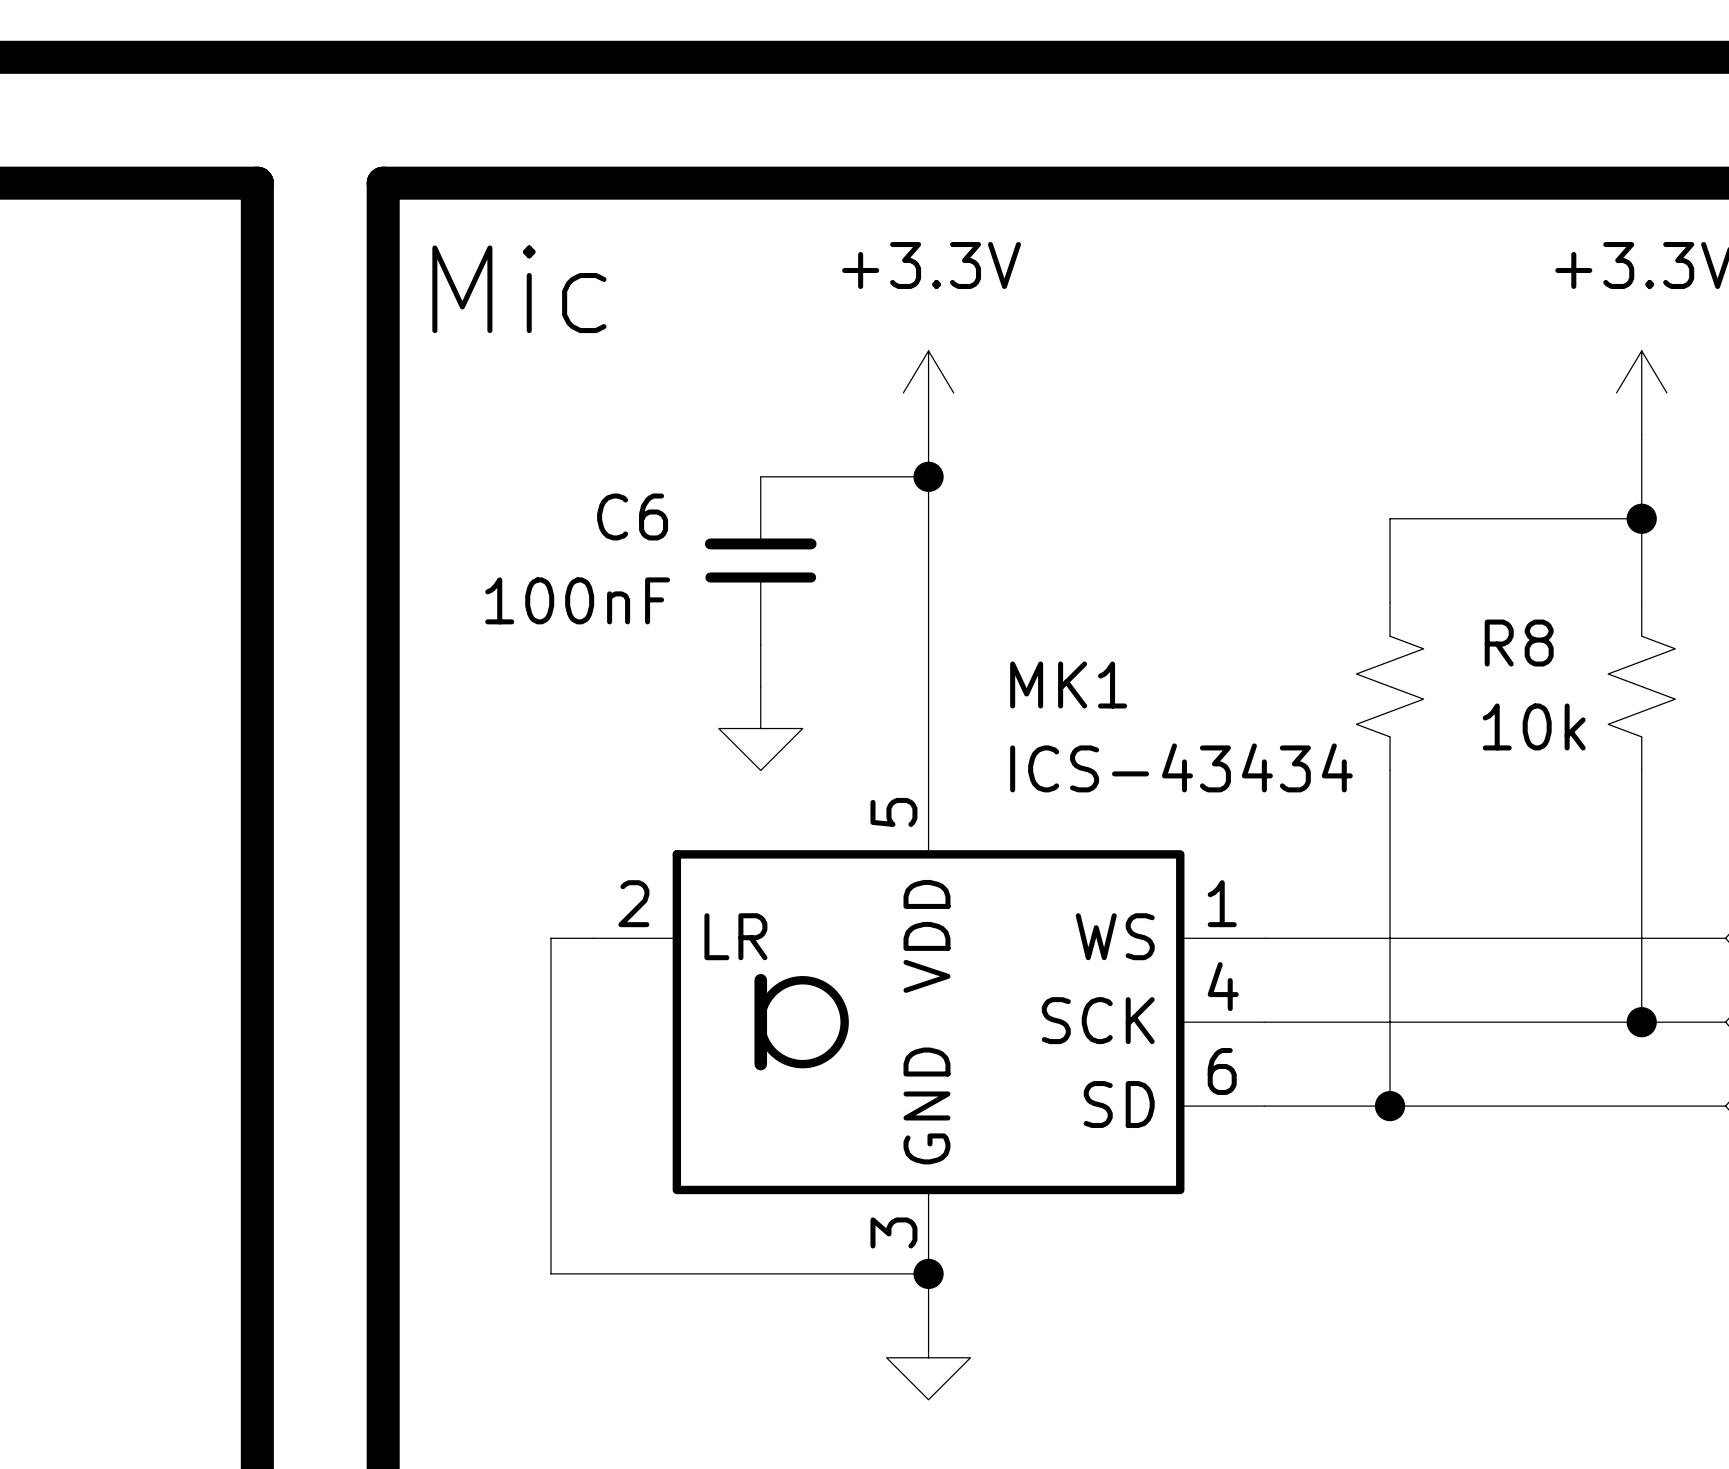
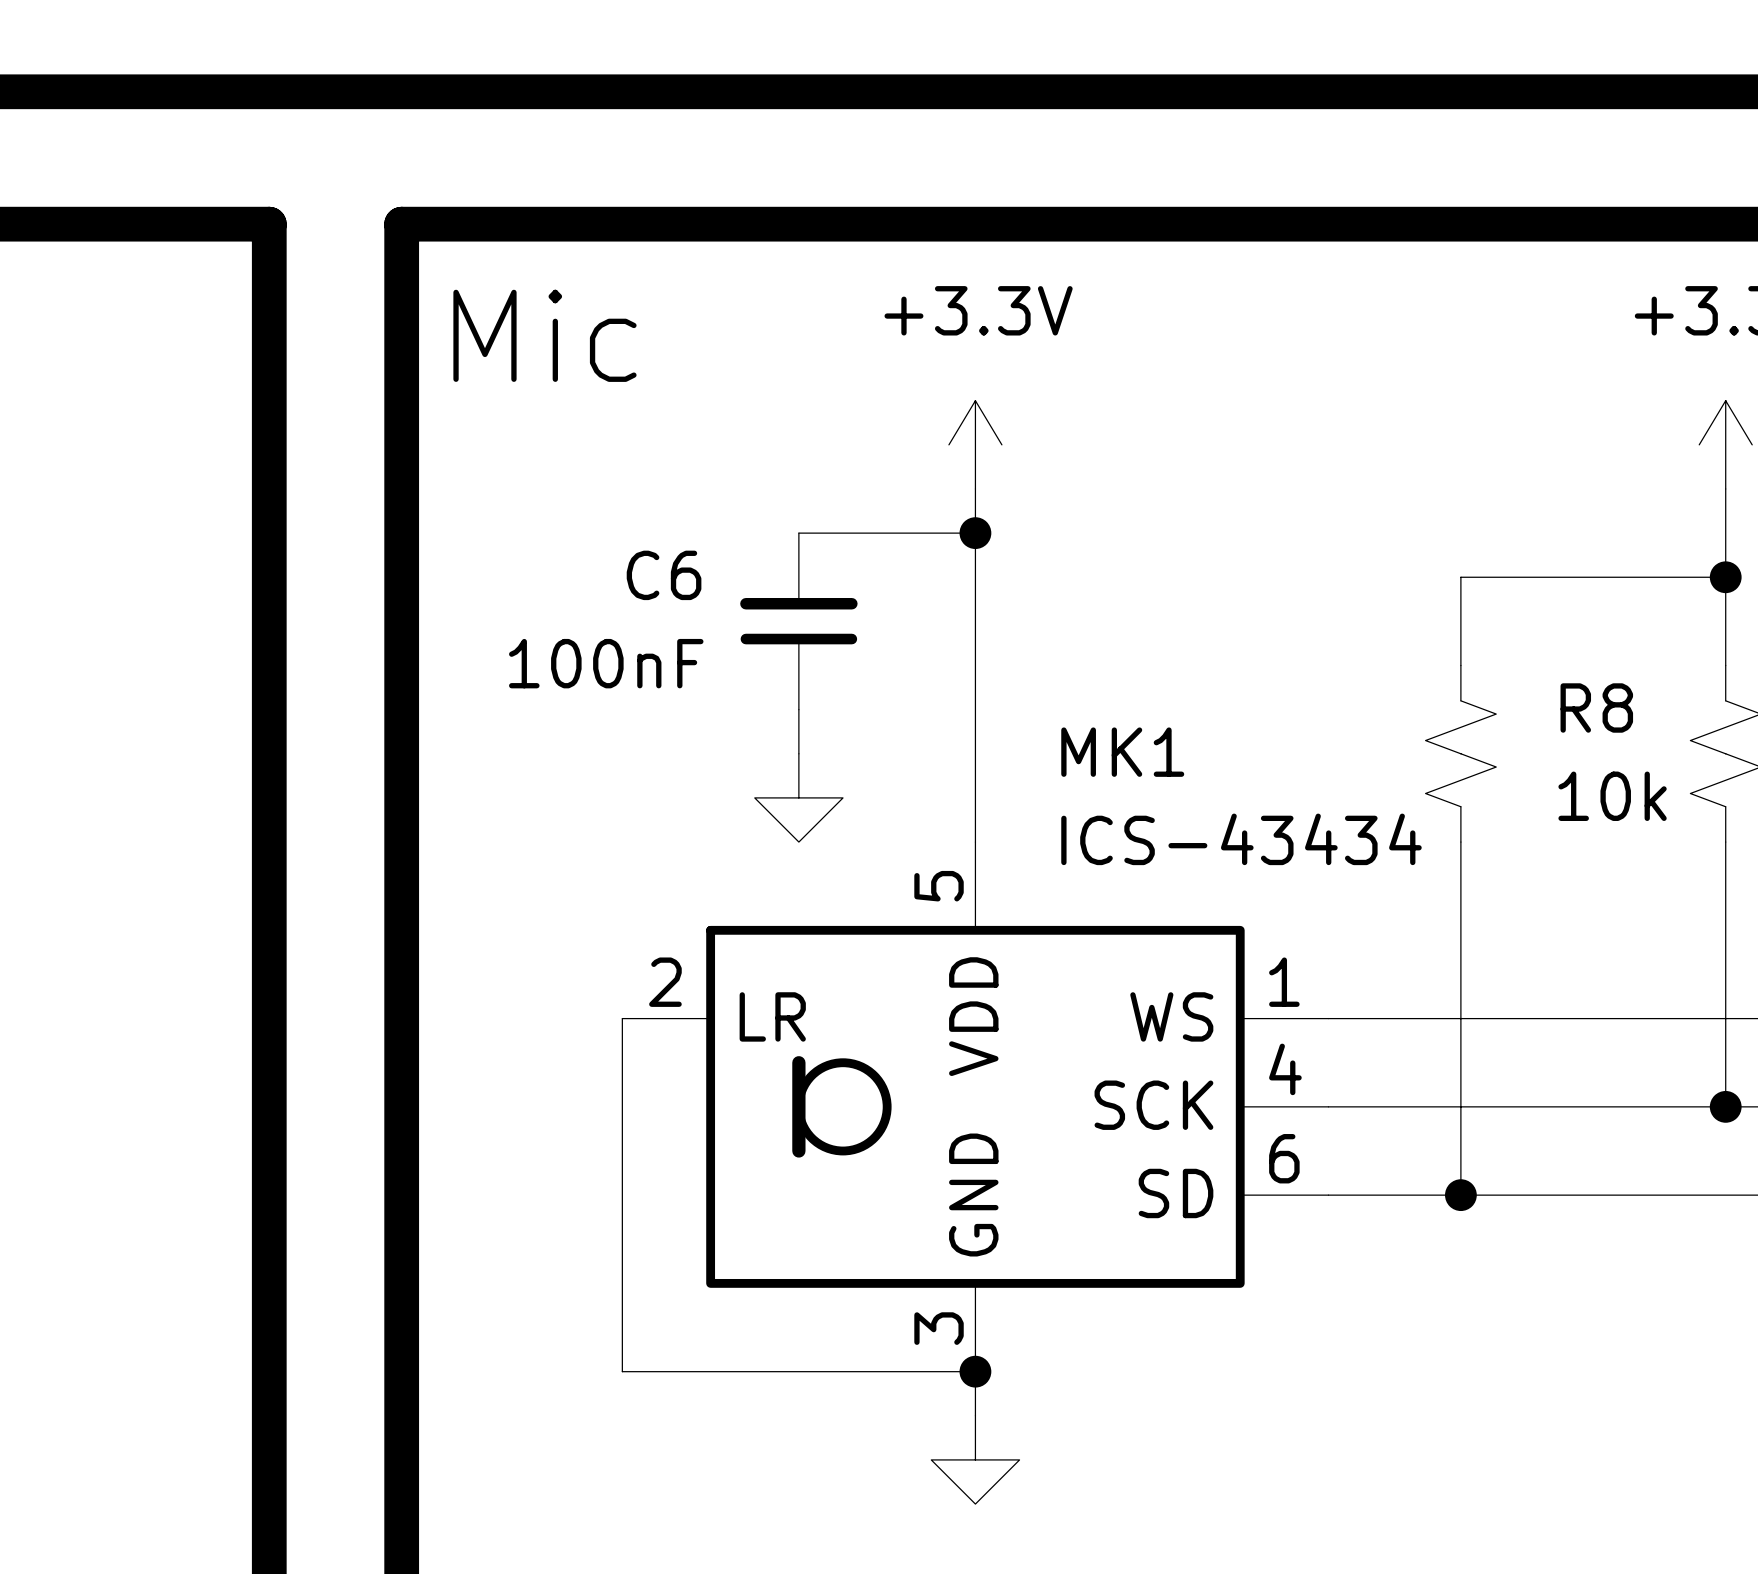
wire: (592, 938) (551, 938) (551, 1273) (592, 1273) -> (622, 1018) (622, 1371)

